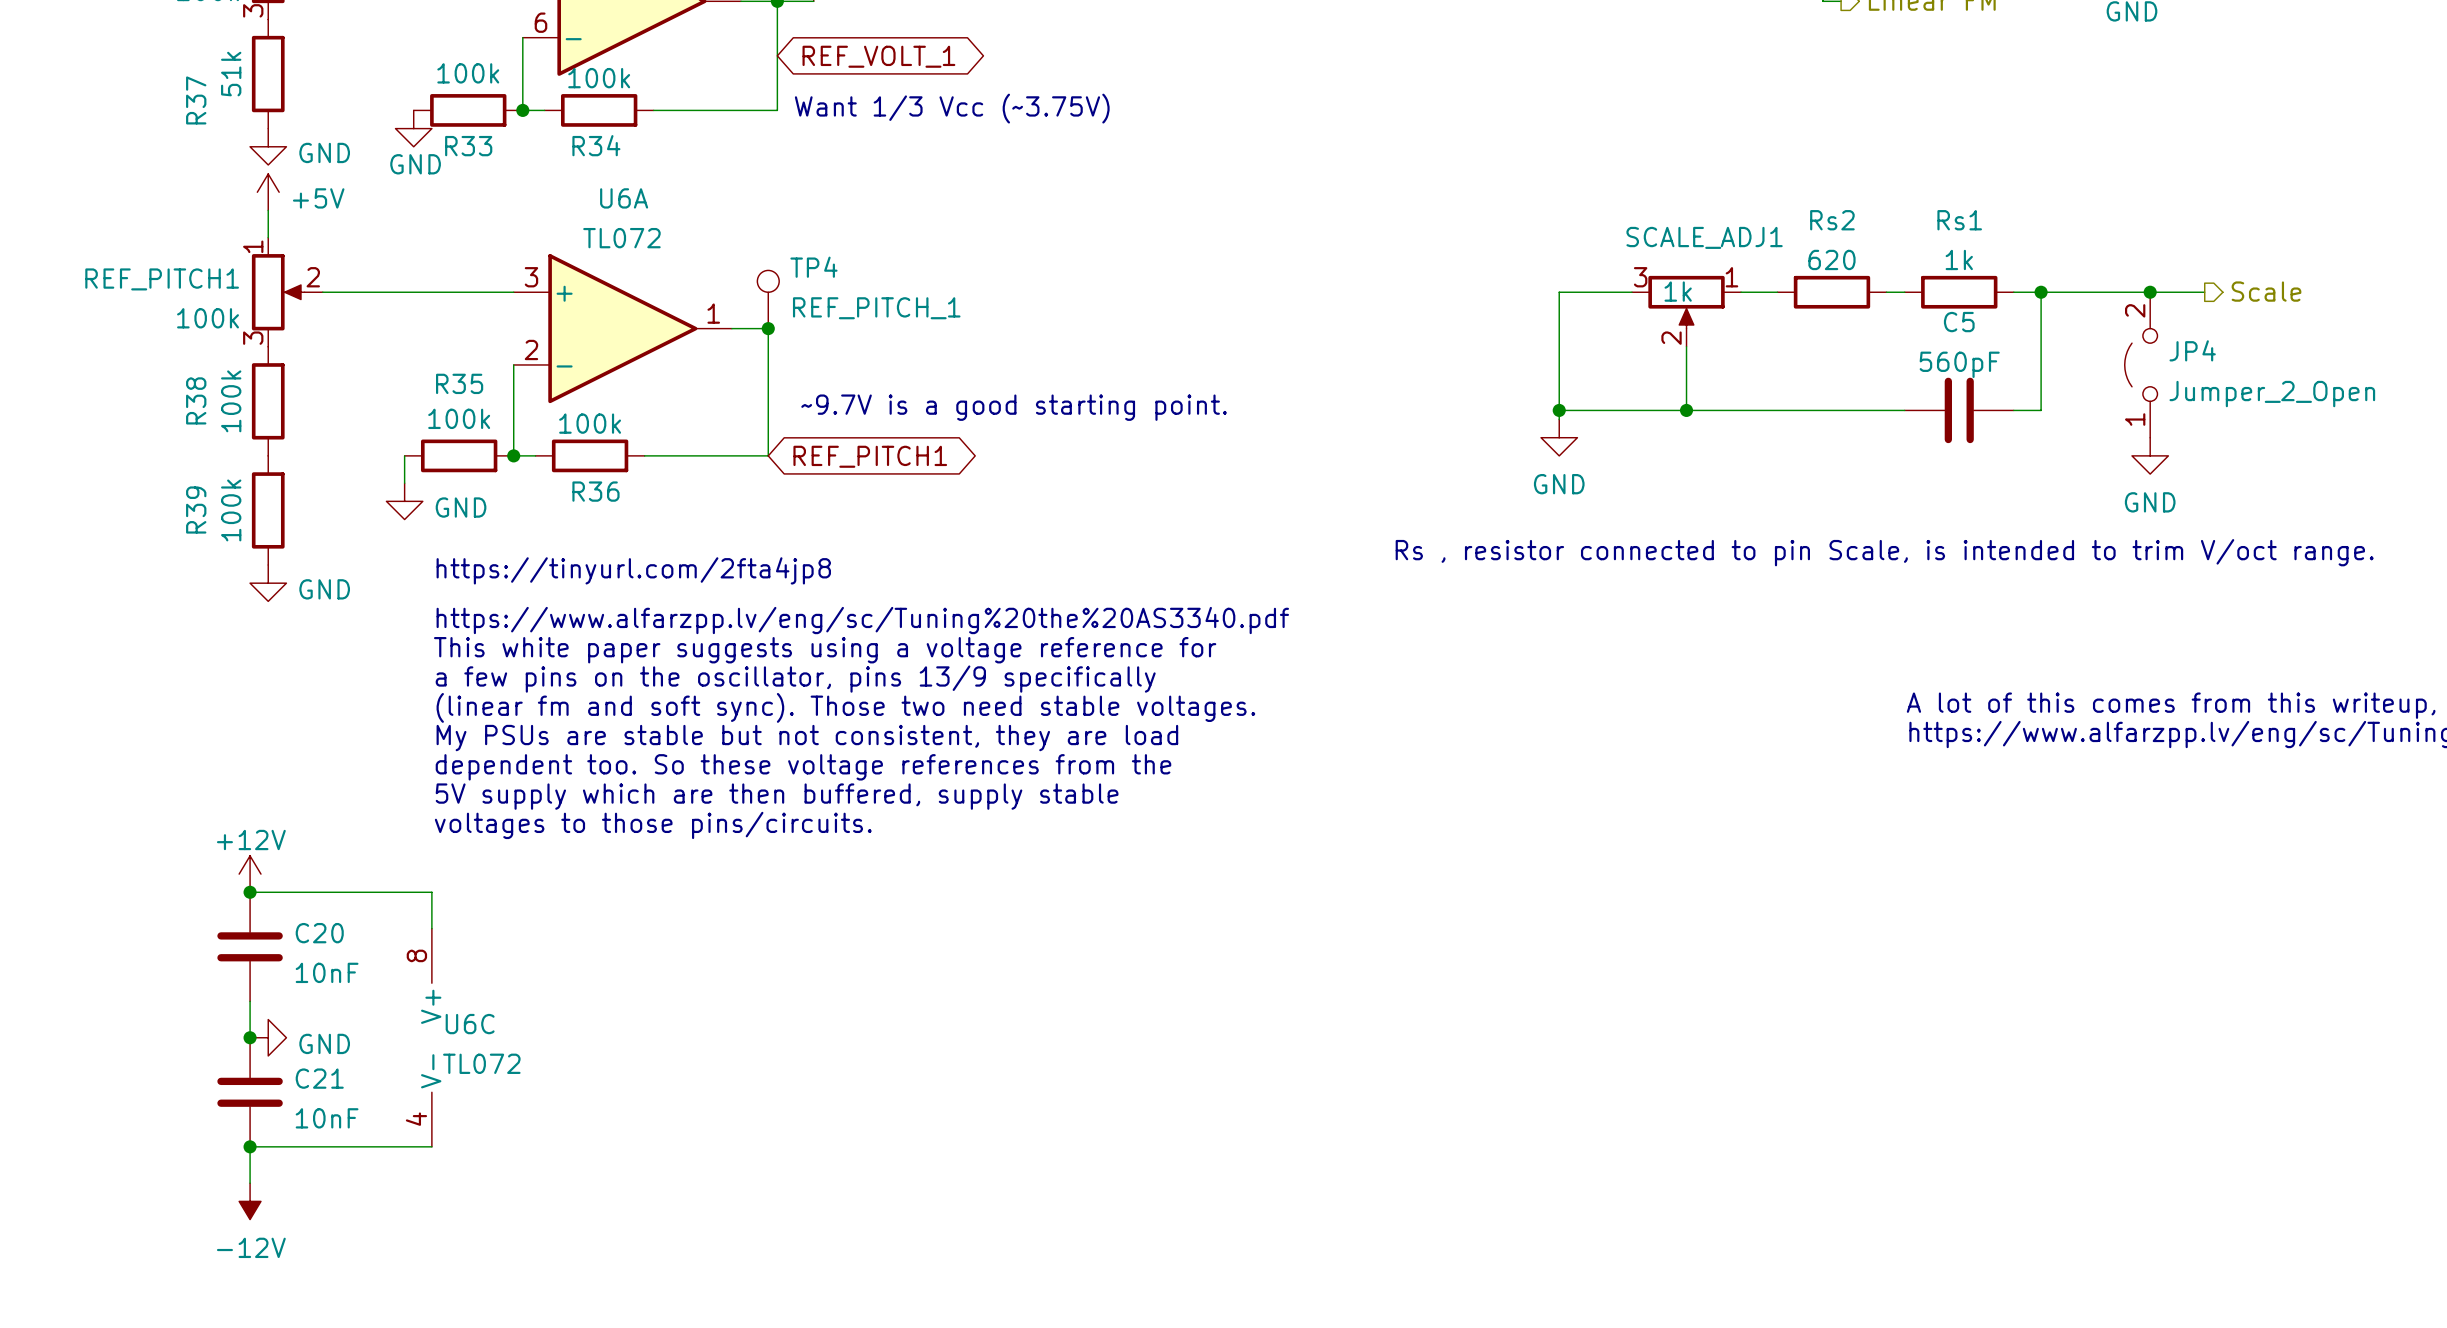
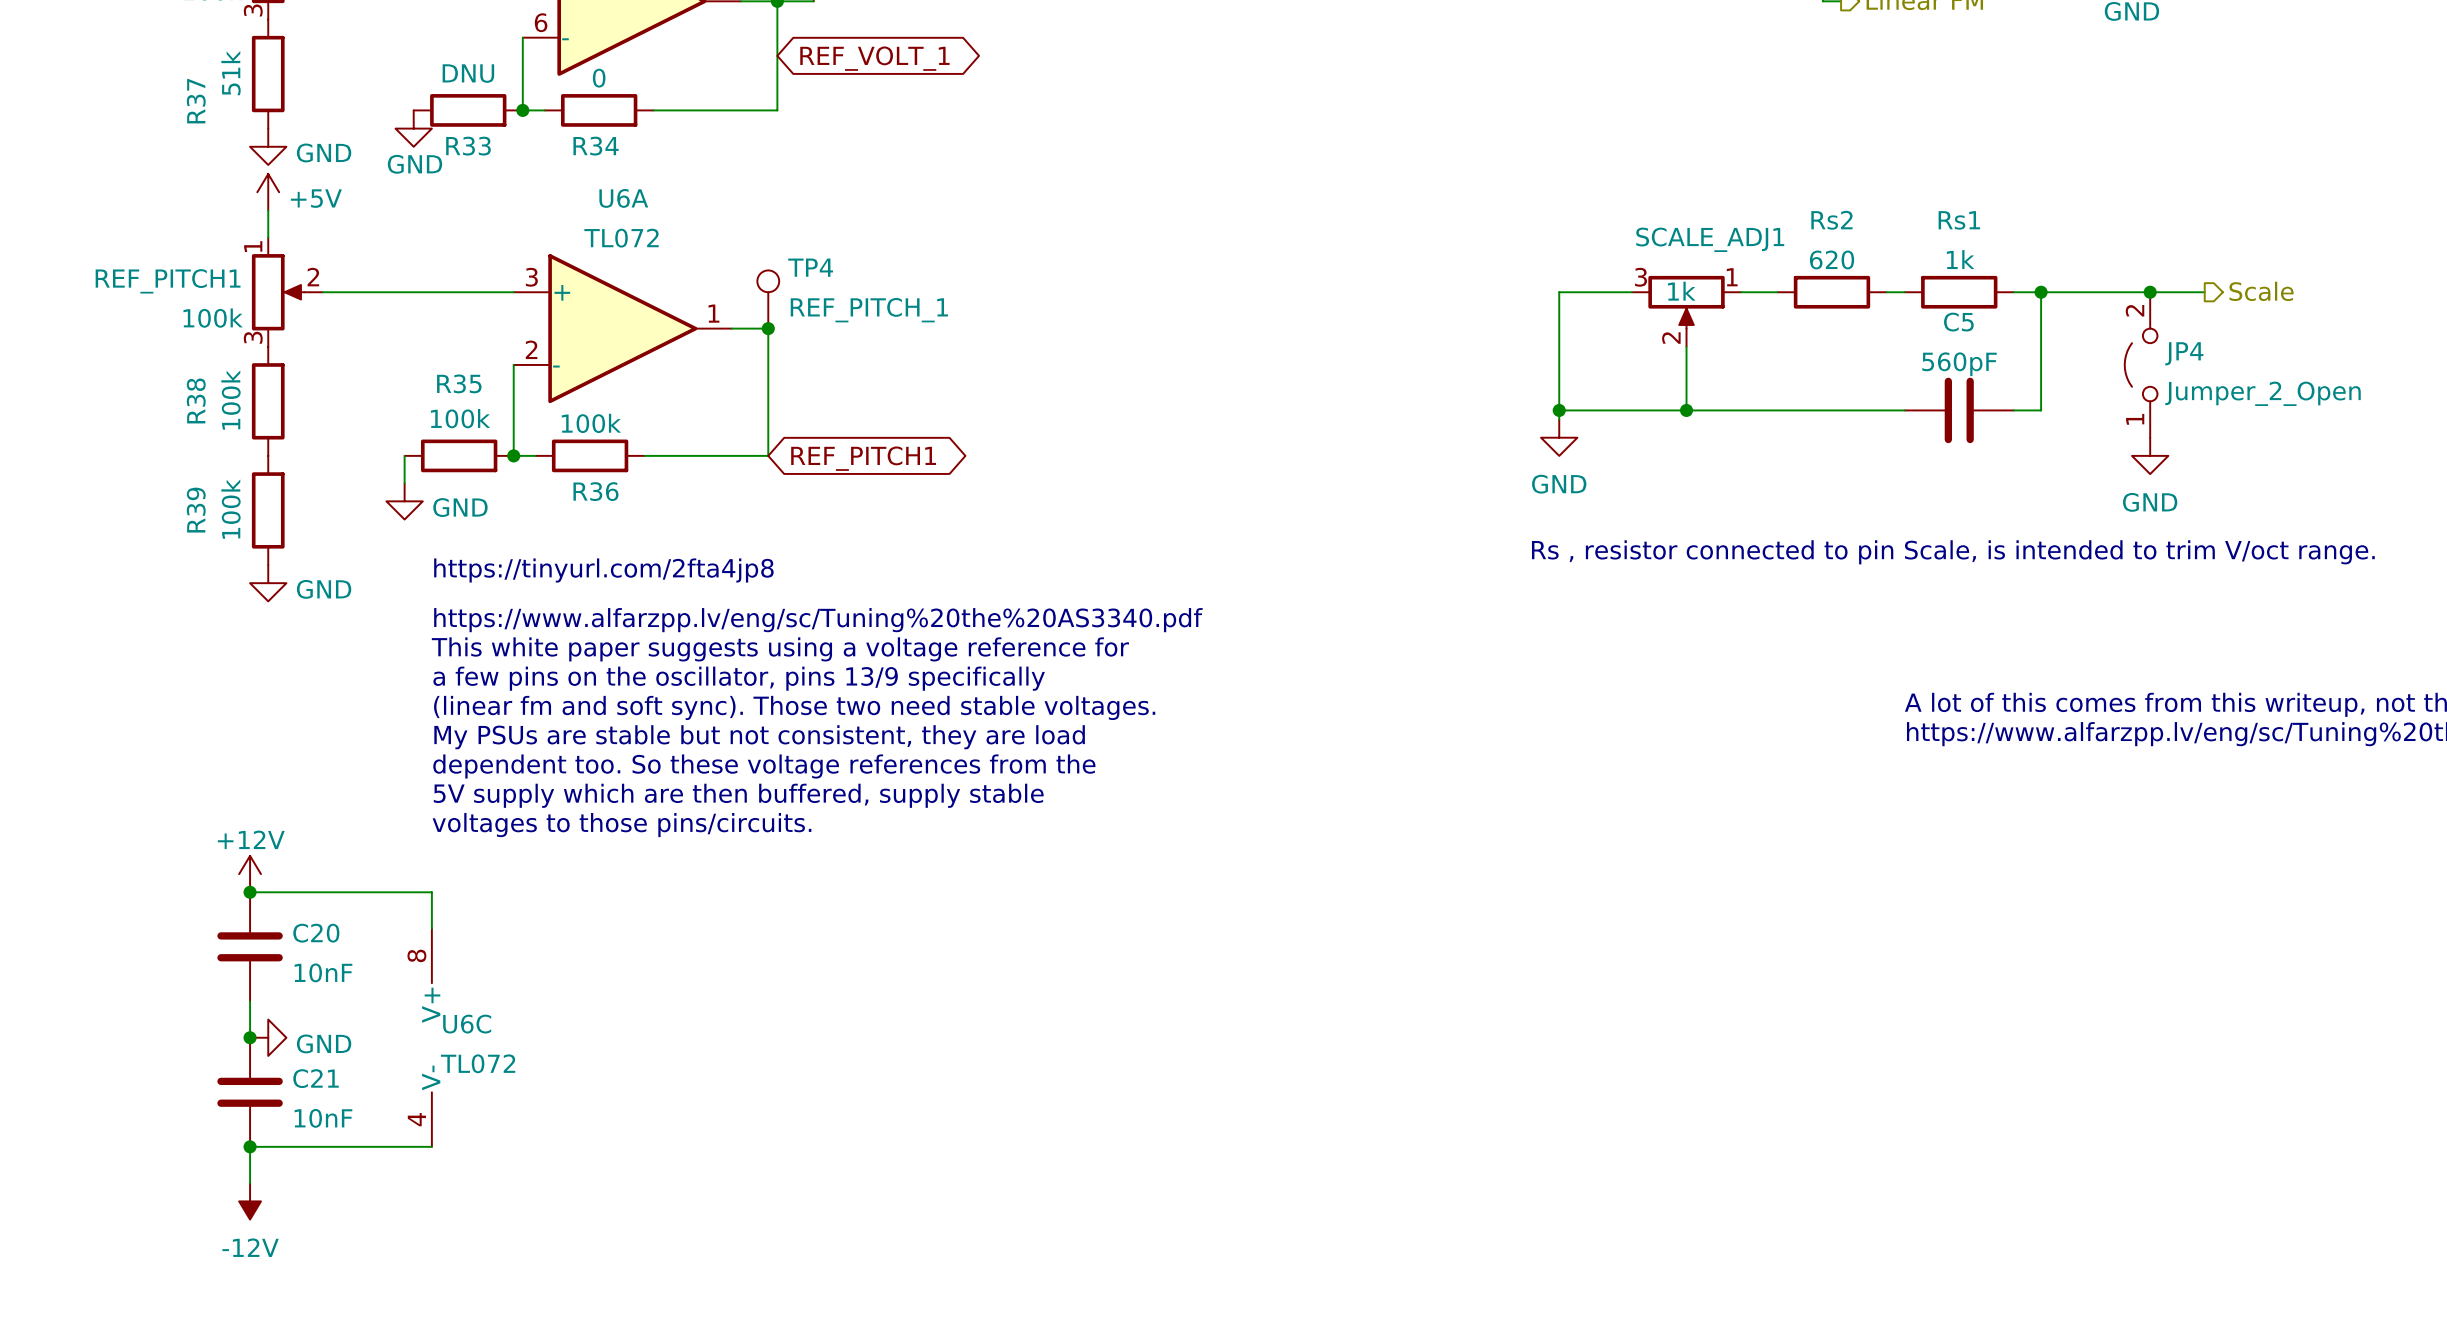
R33 value: 100k (468, 73) -> DNU (468, 73)
R34 value: 100k (599, 78) -> 0 (599, 78)
text: Want 1/3 Vcc (~3.75V) (952, 108) -> none
text: ~9.7V is a good starting point. (1014, 407) -> none

